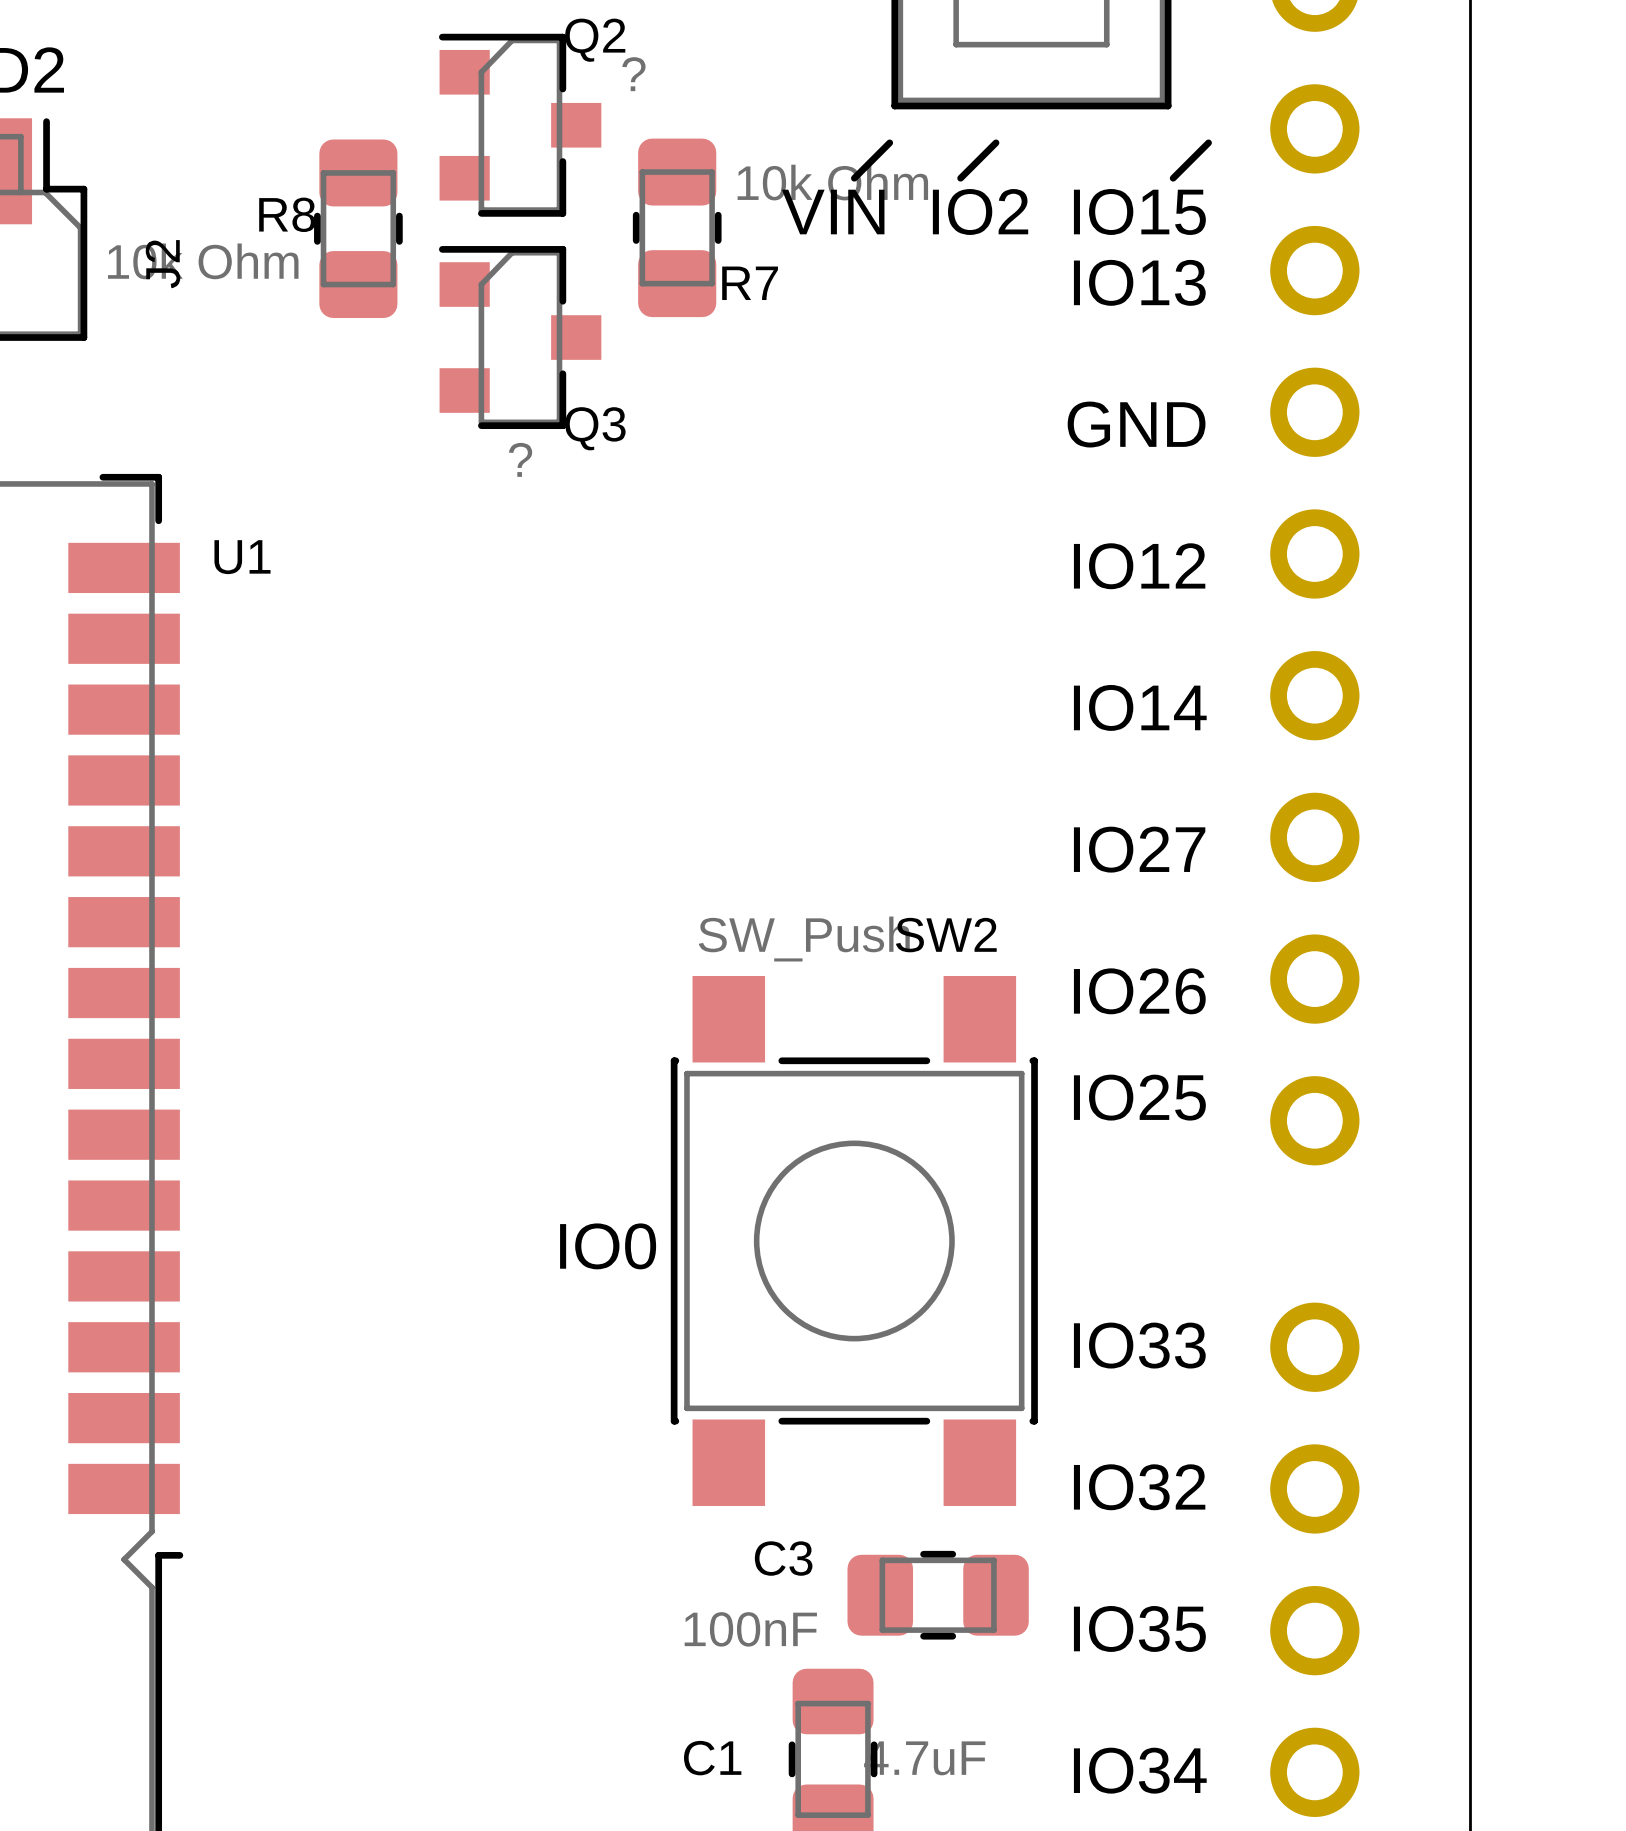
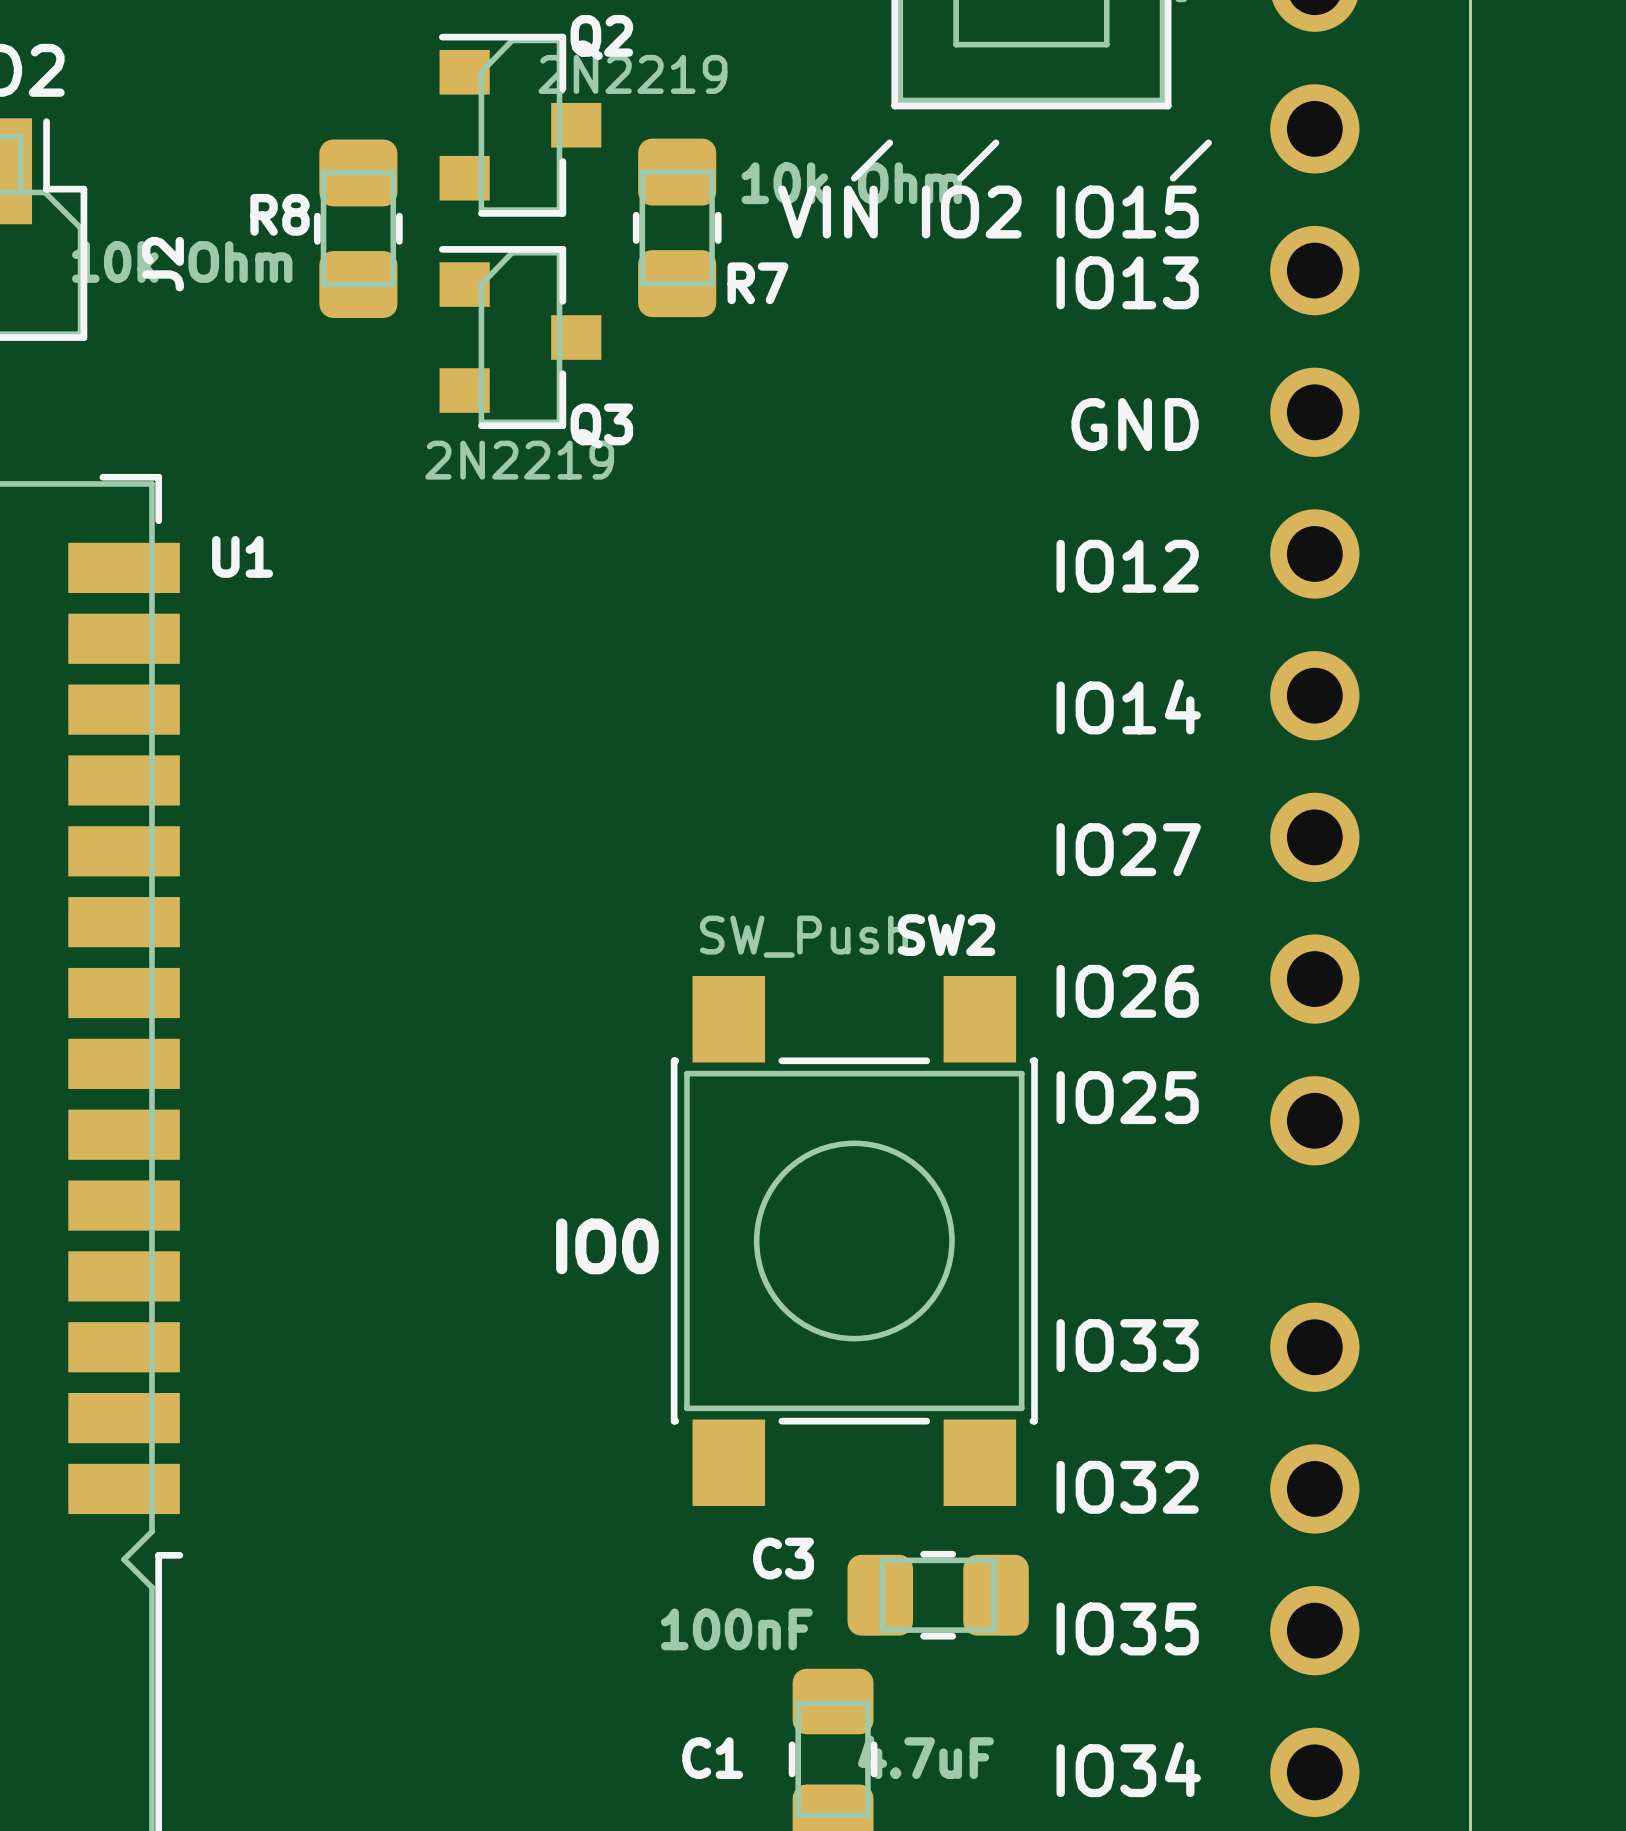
Q2 value: ? (633, 74) -> 2N2219 (633, 74)
Q3 value: ? (520, 459) -> 2N2219 (519, 460)

